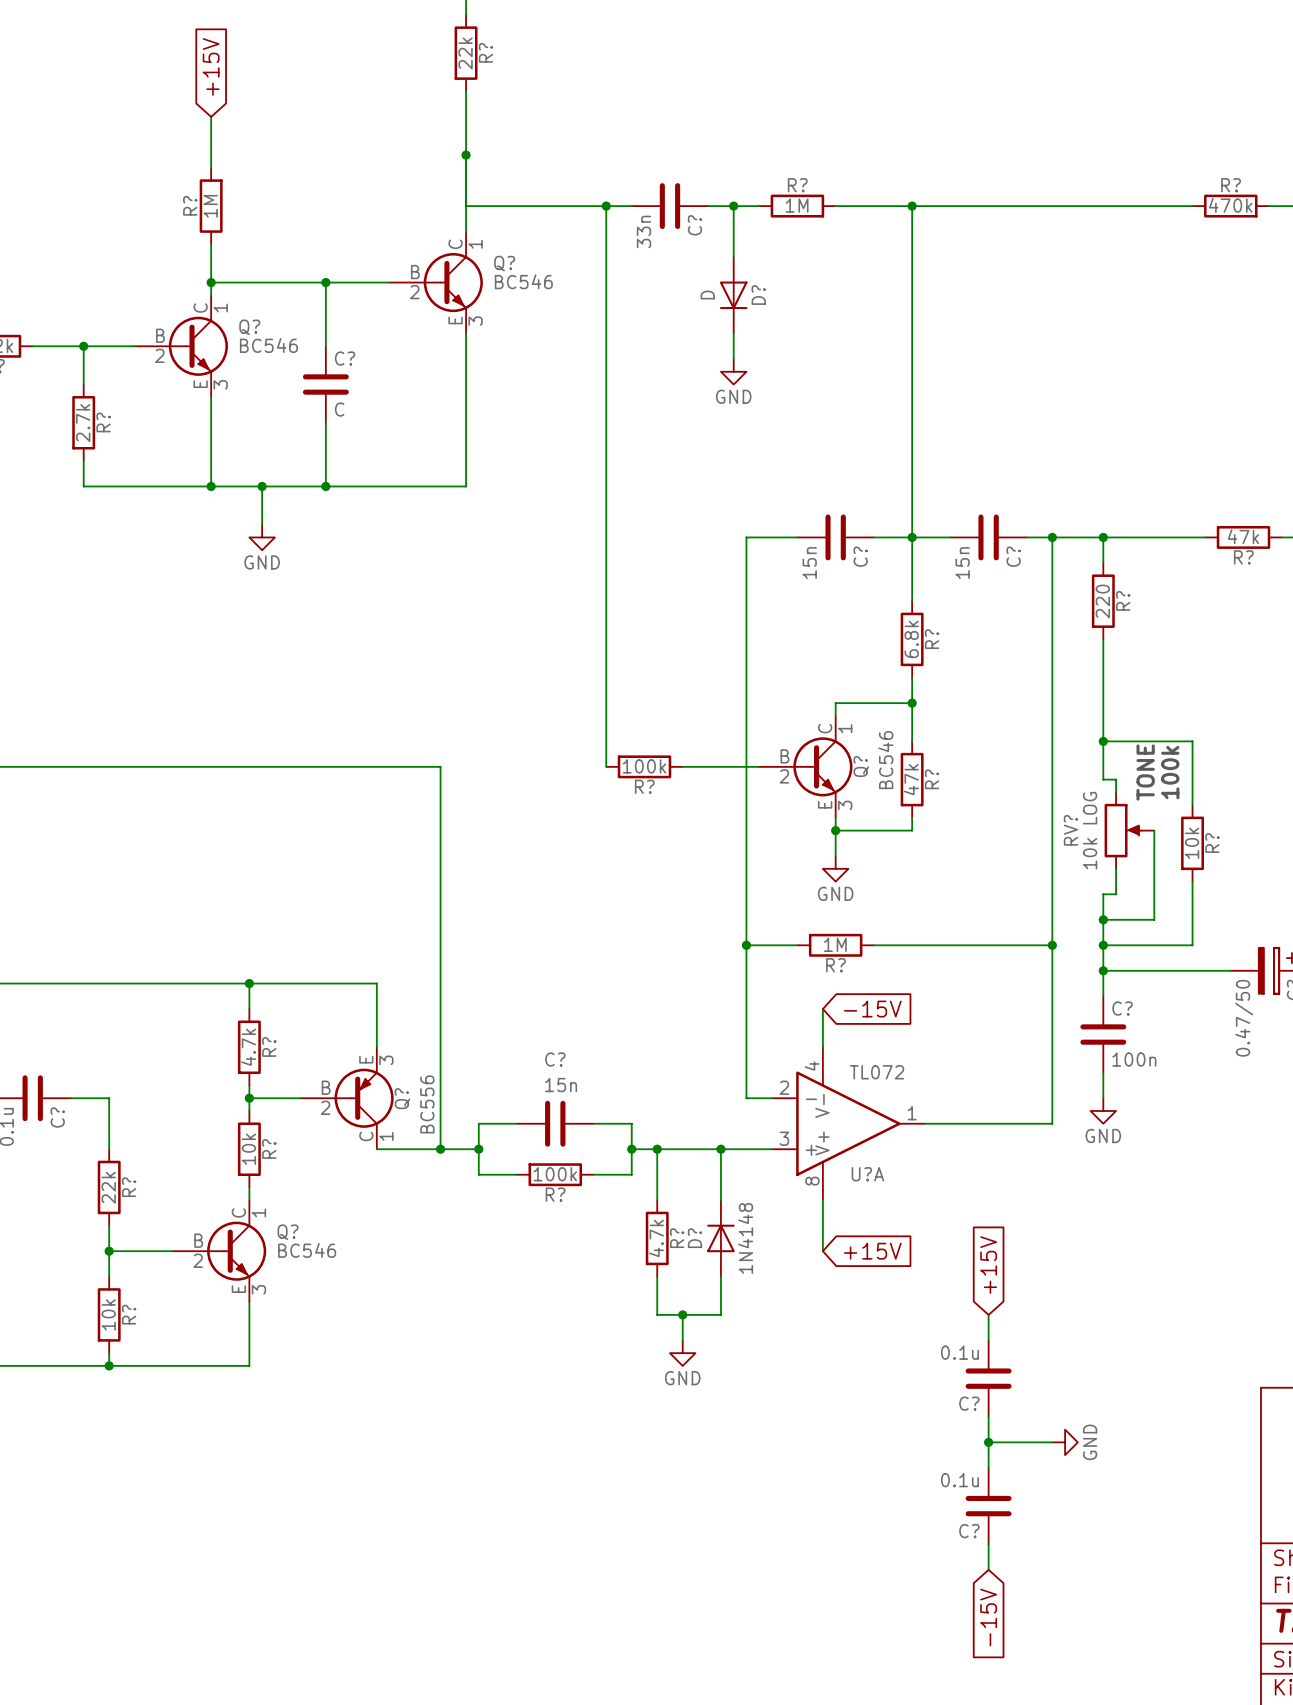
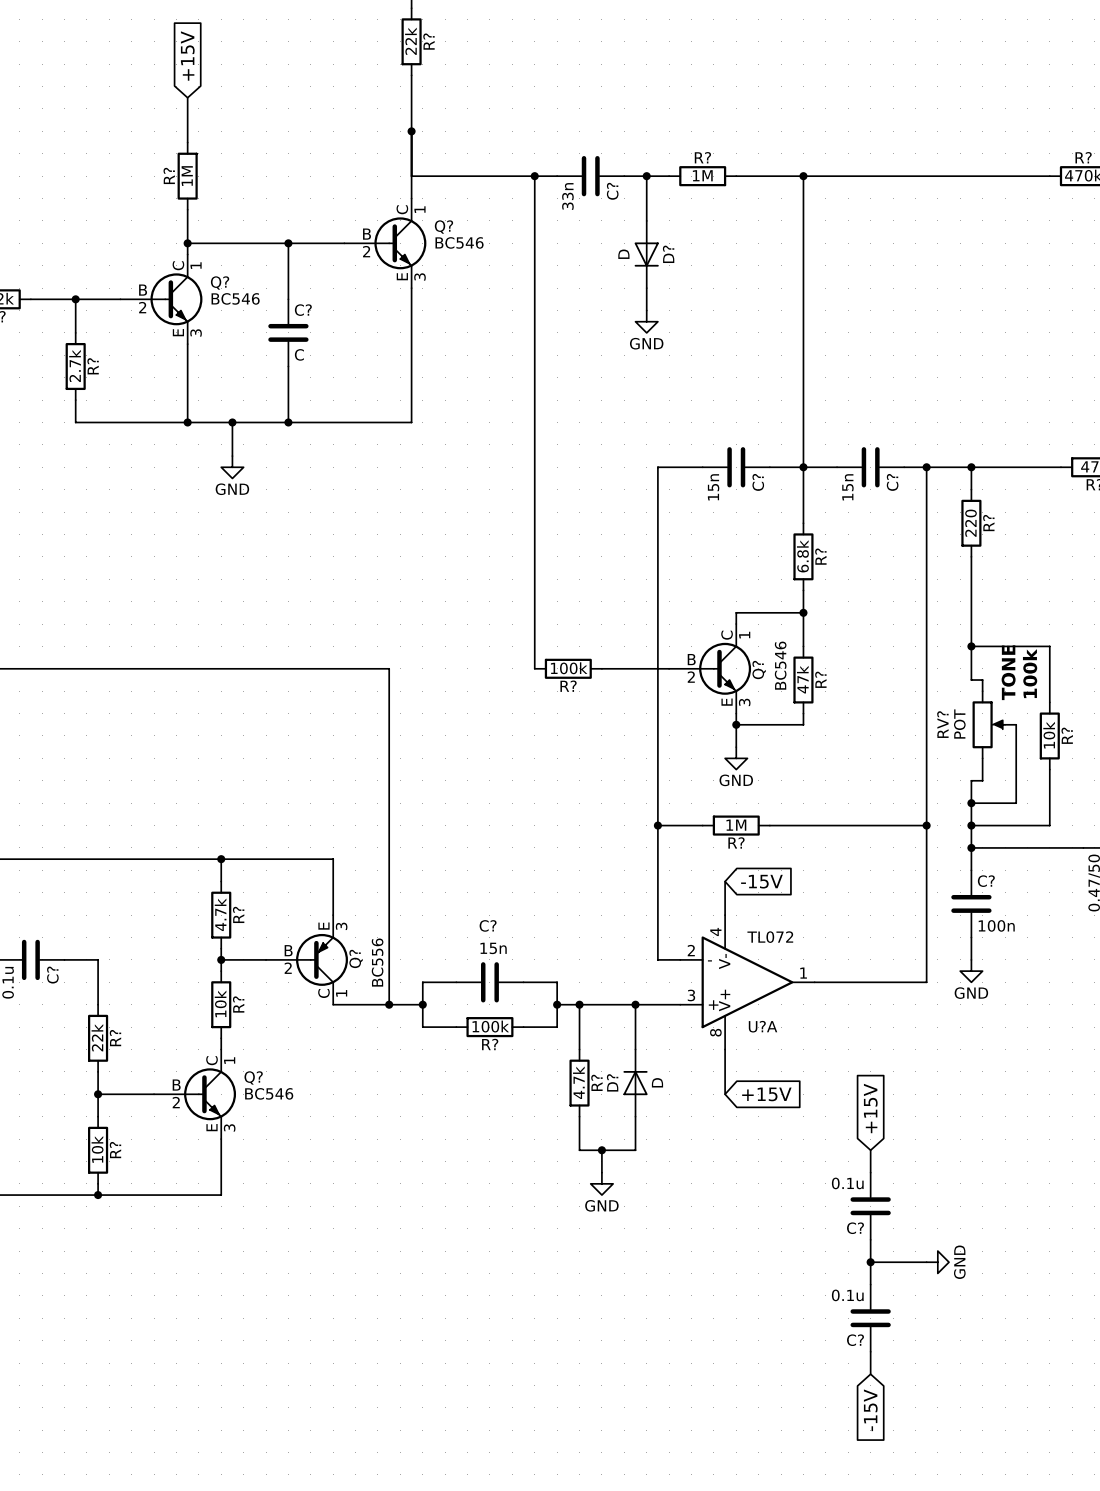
RV? value: 10k LOG (1090, 830) -> POT (959, 724)
D? value: 1N4148 (745, 1238) -> D (657, 1082)

